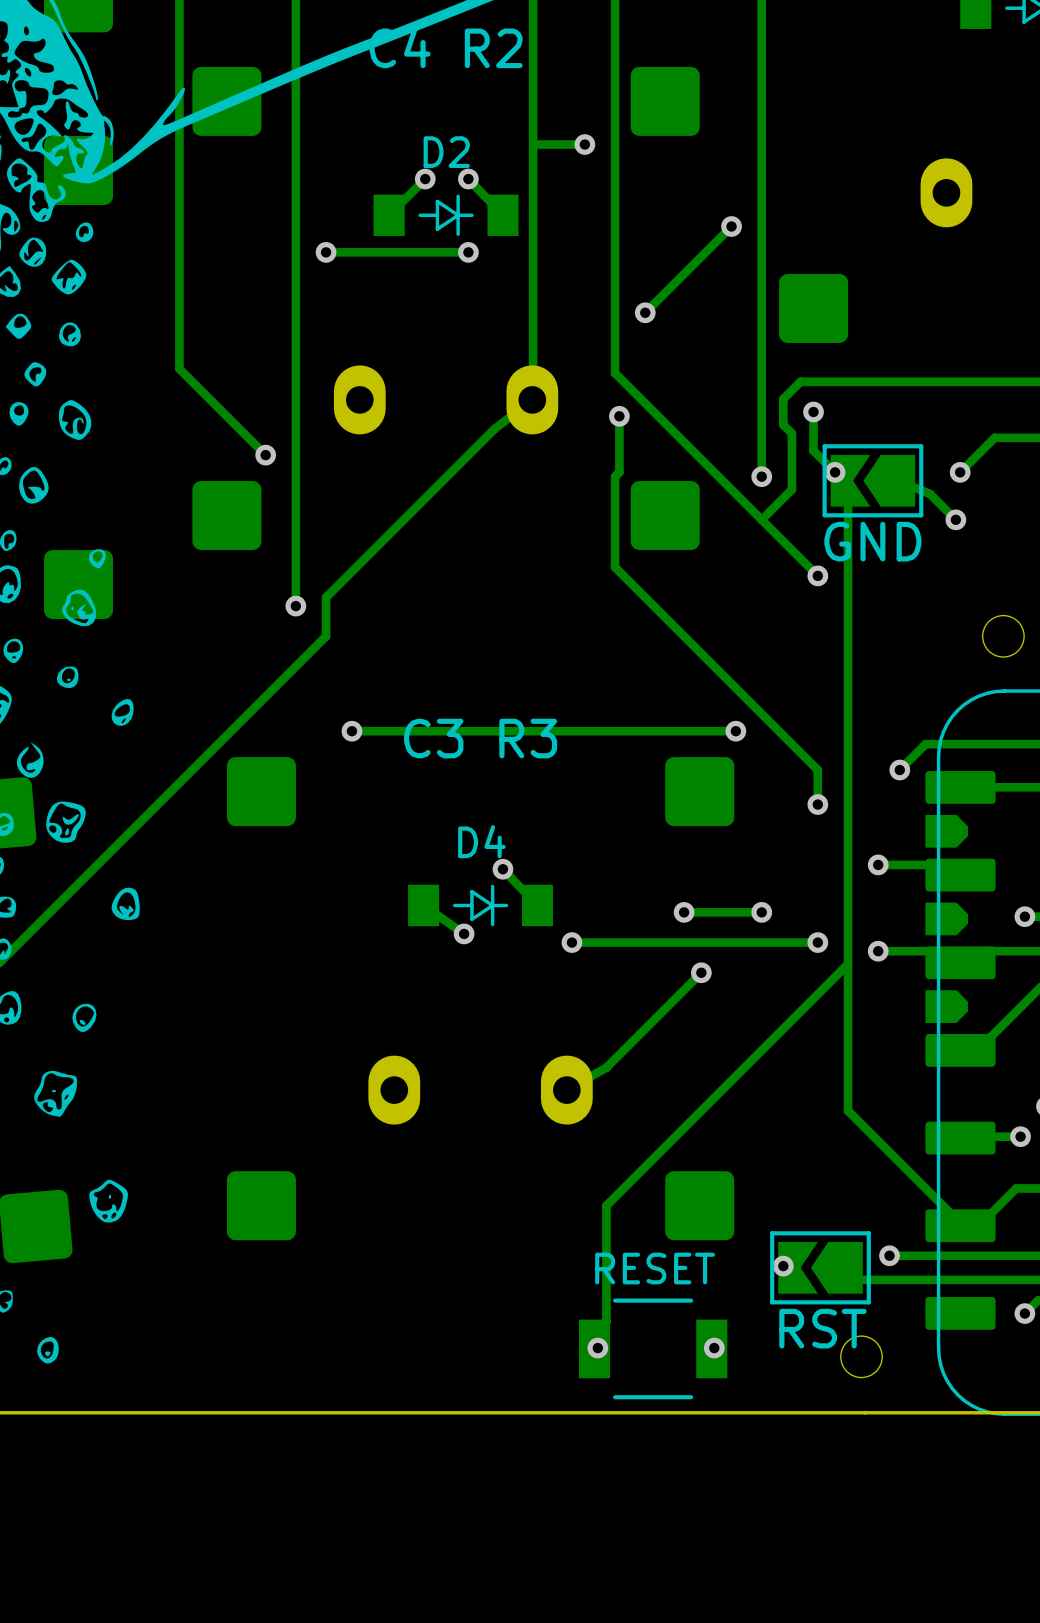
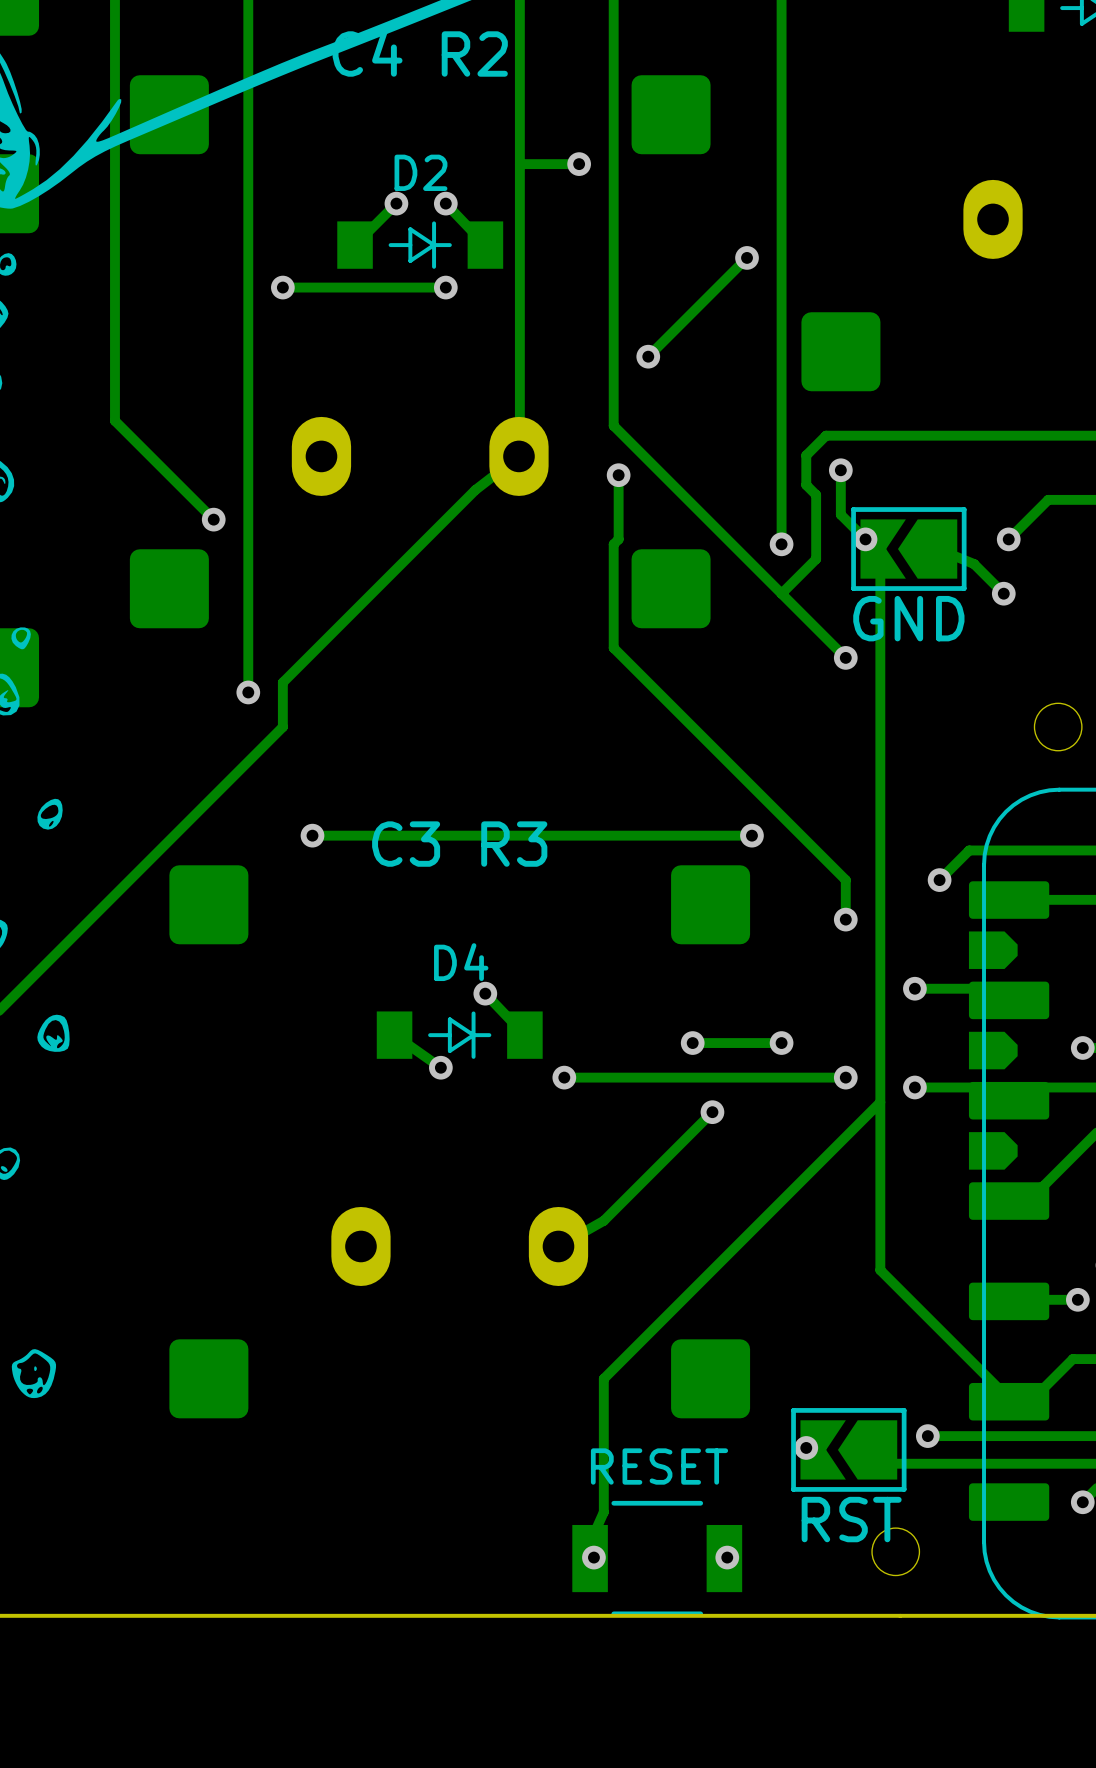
via position: (597, 1348) -> (593, 1557)
part position: (653, 1348) -> (657, 1558)
via position: (714, 1348) -> (727, 1557)

